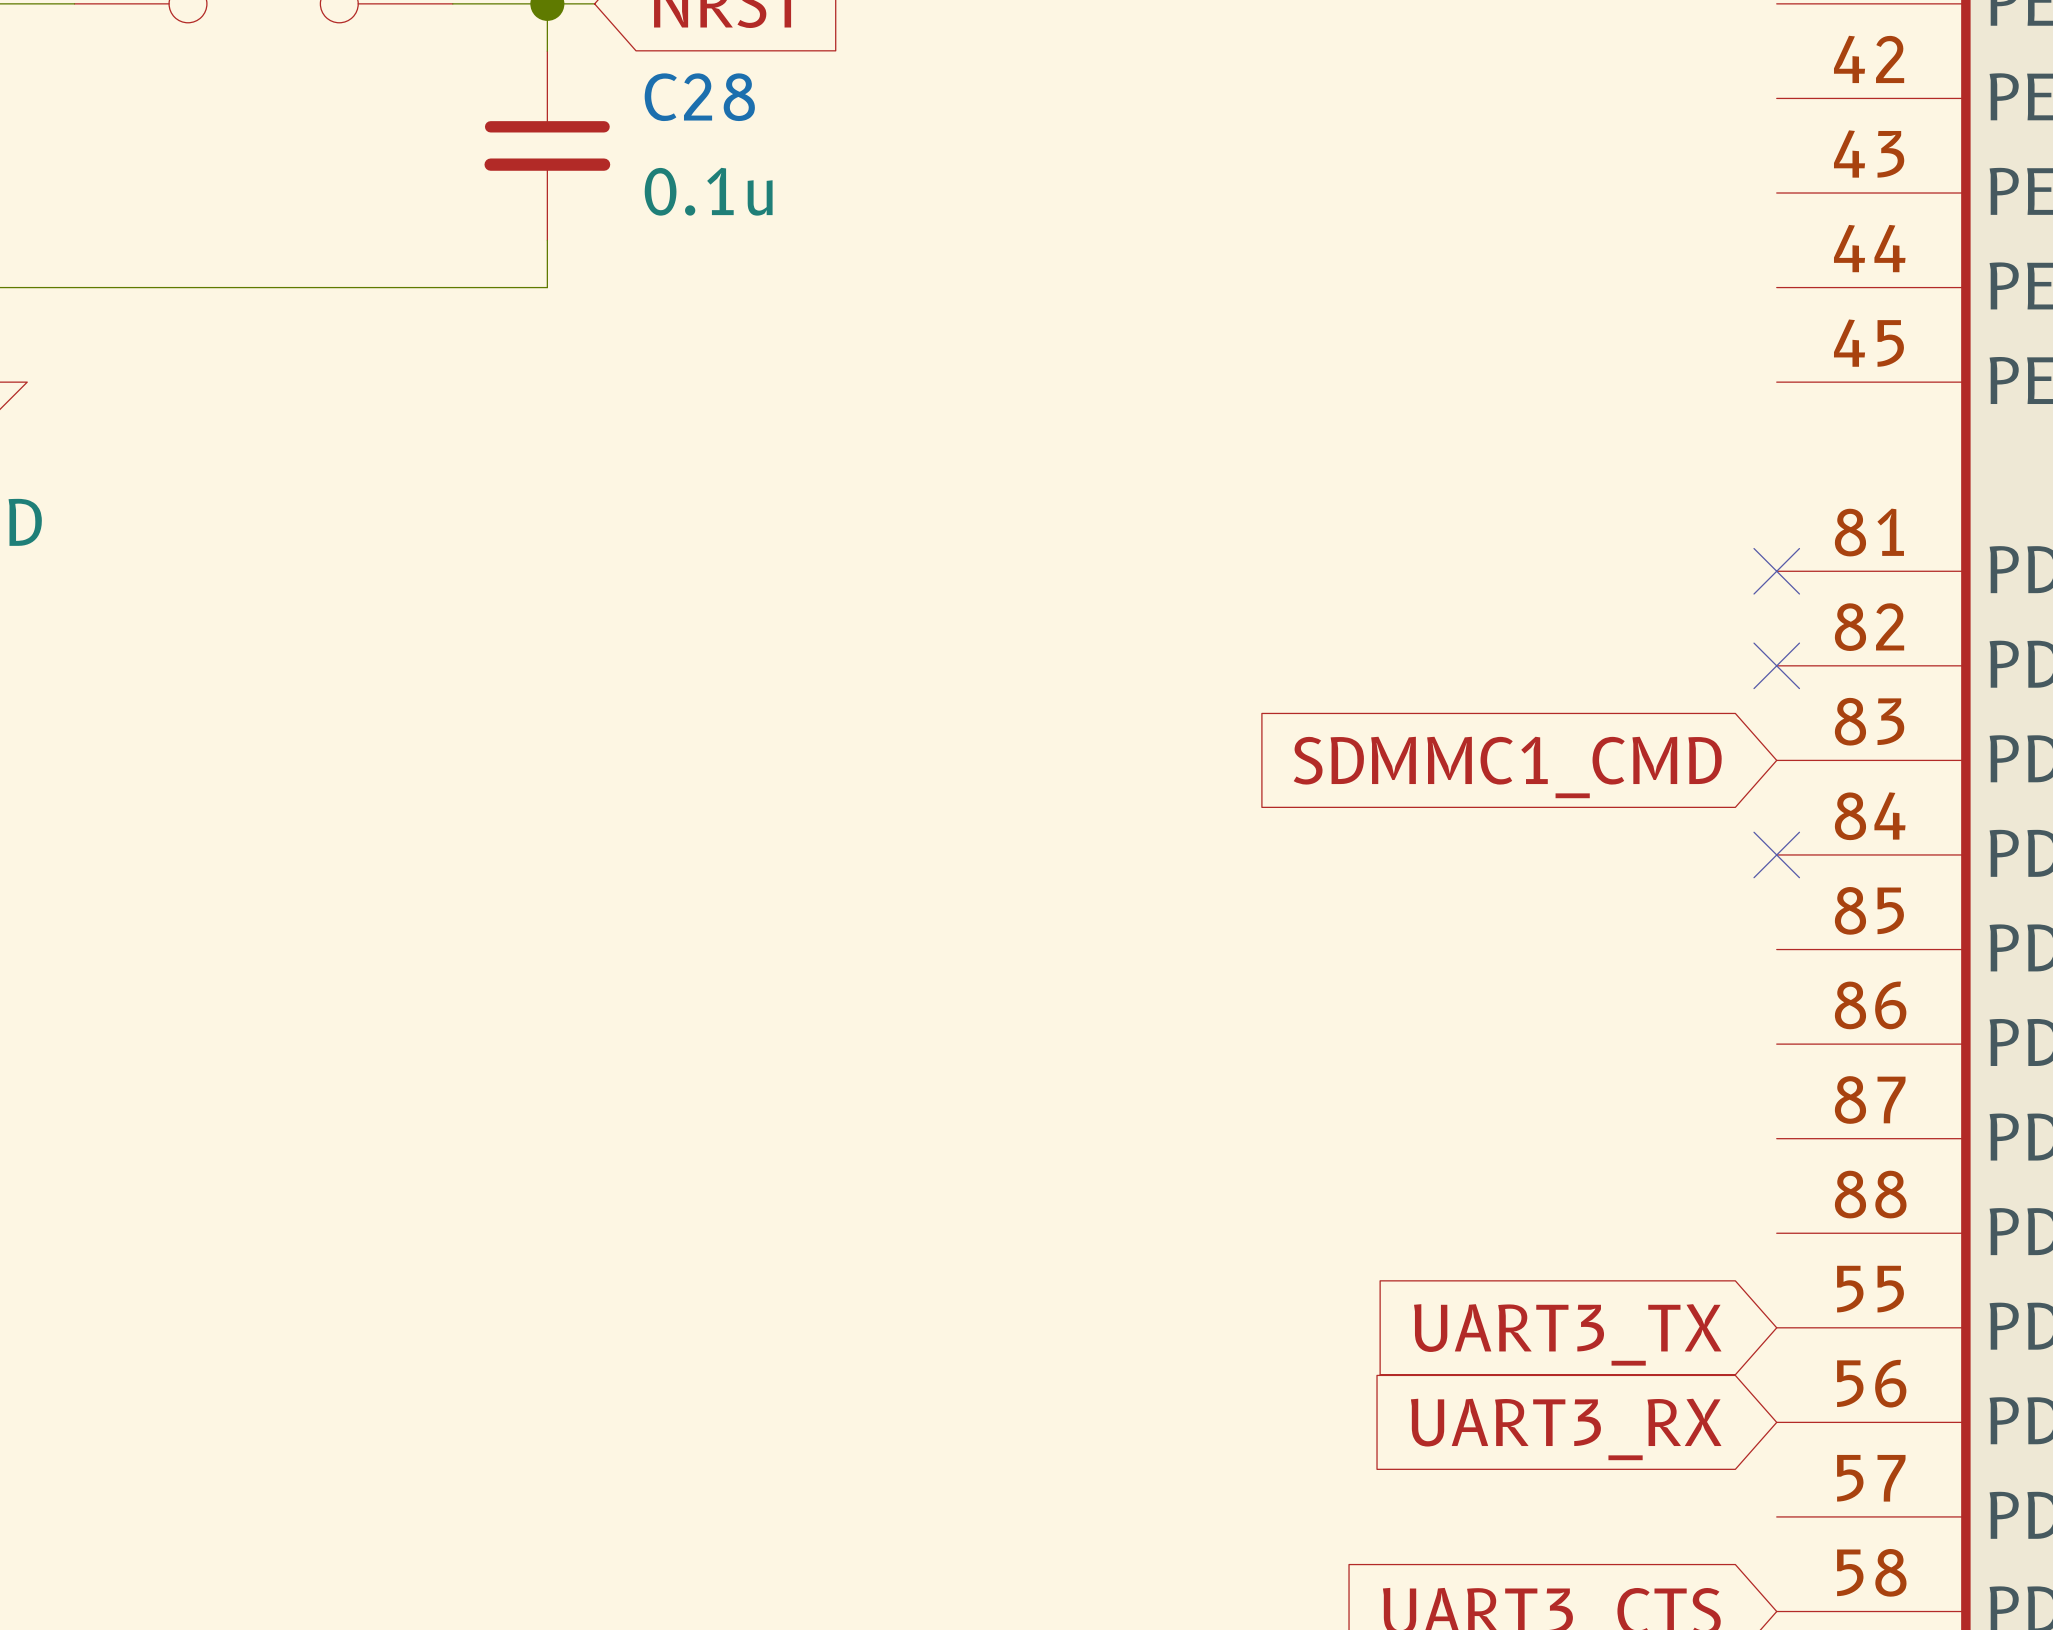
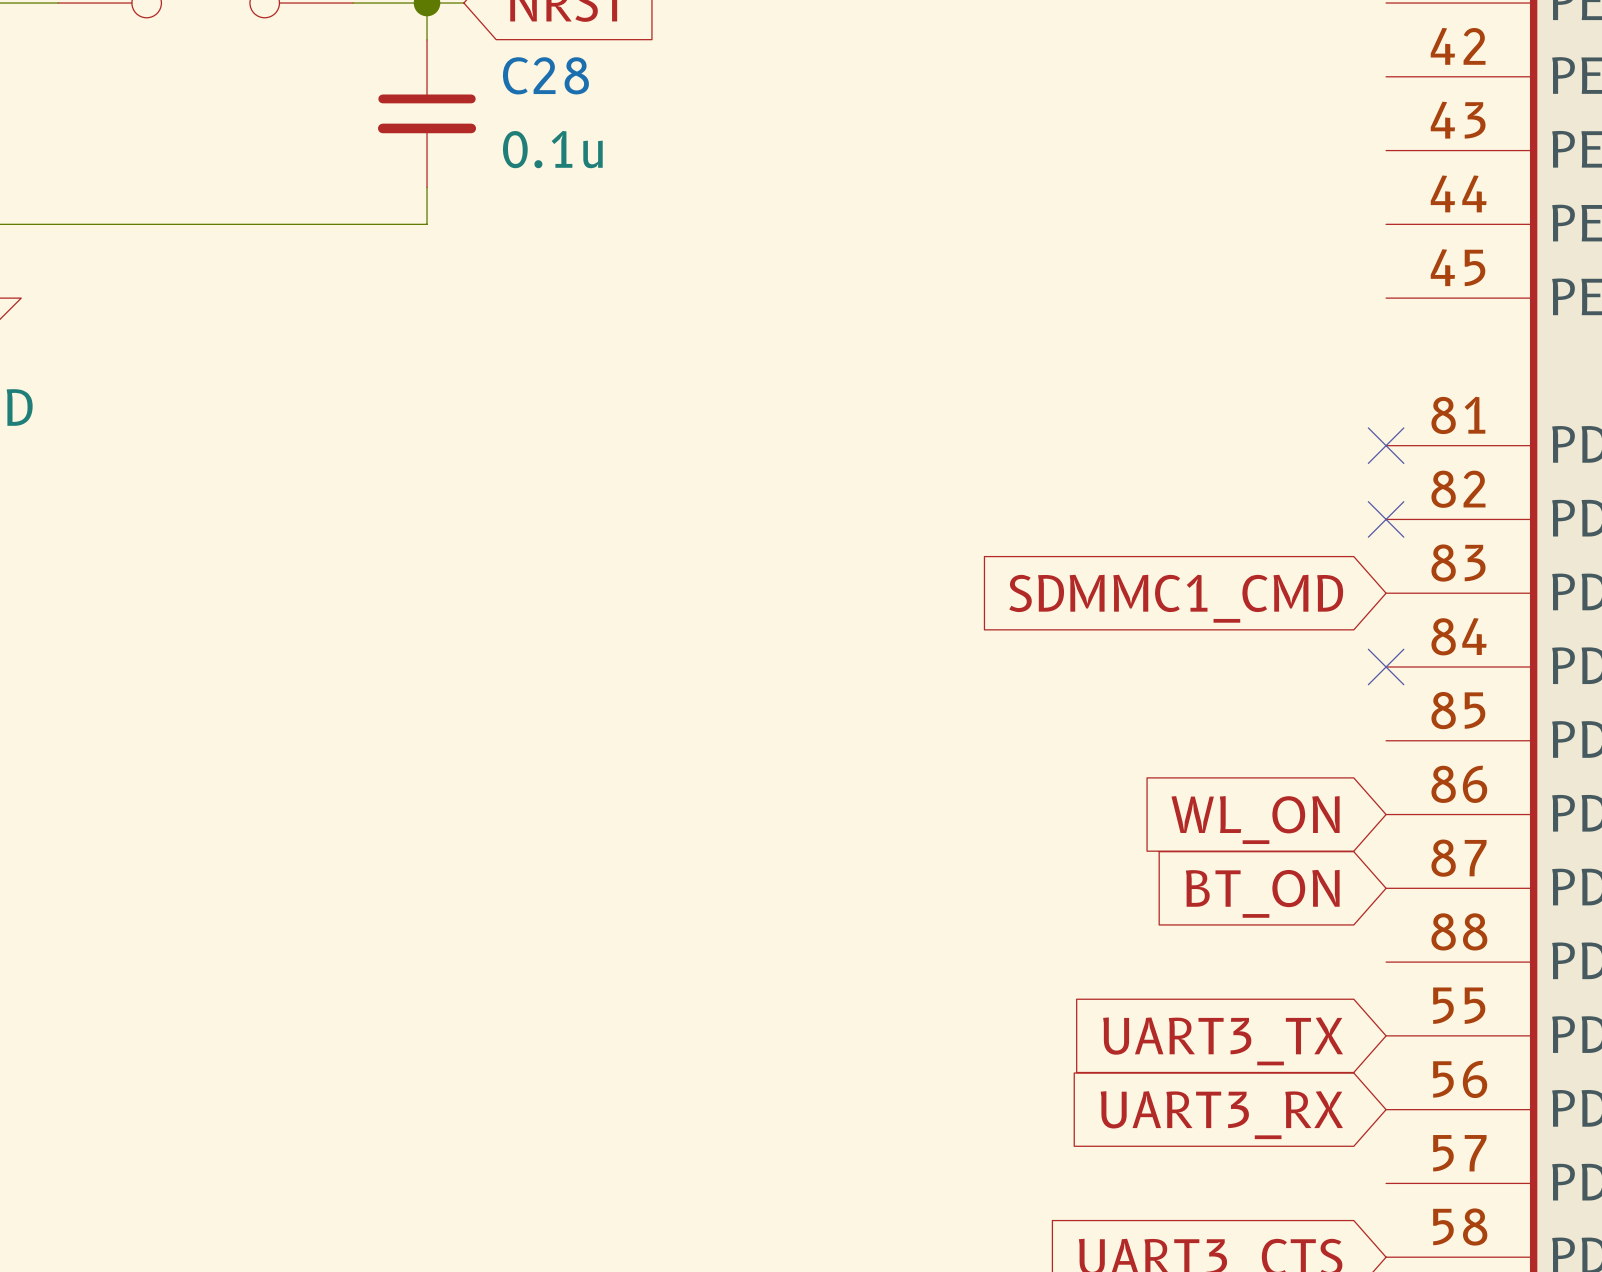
global label: none -> WL_ON (1255, 820)
global label: none -> BT_ON (1262, 893)

